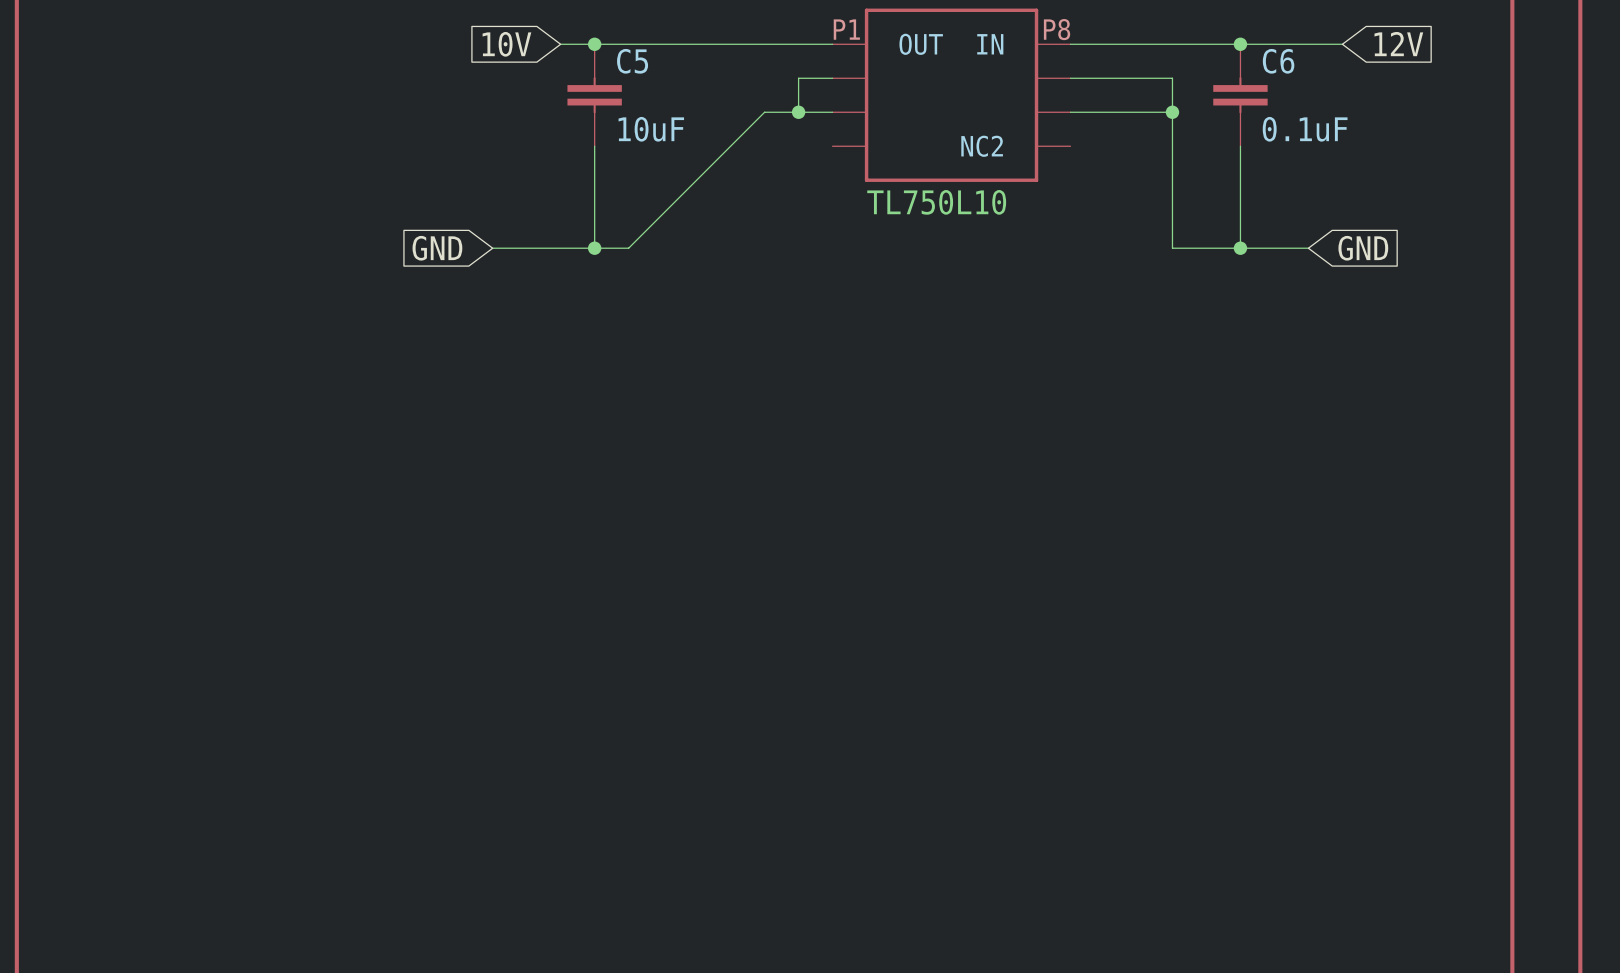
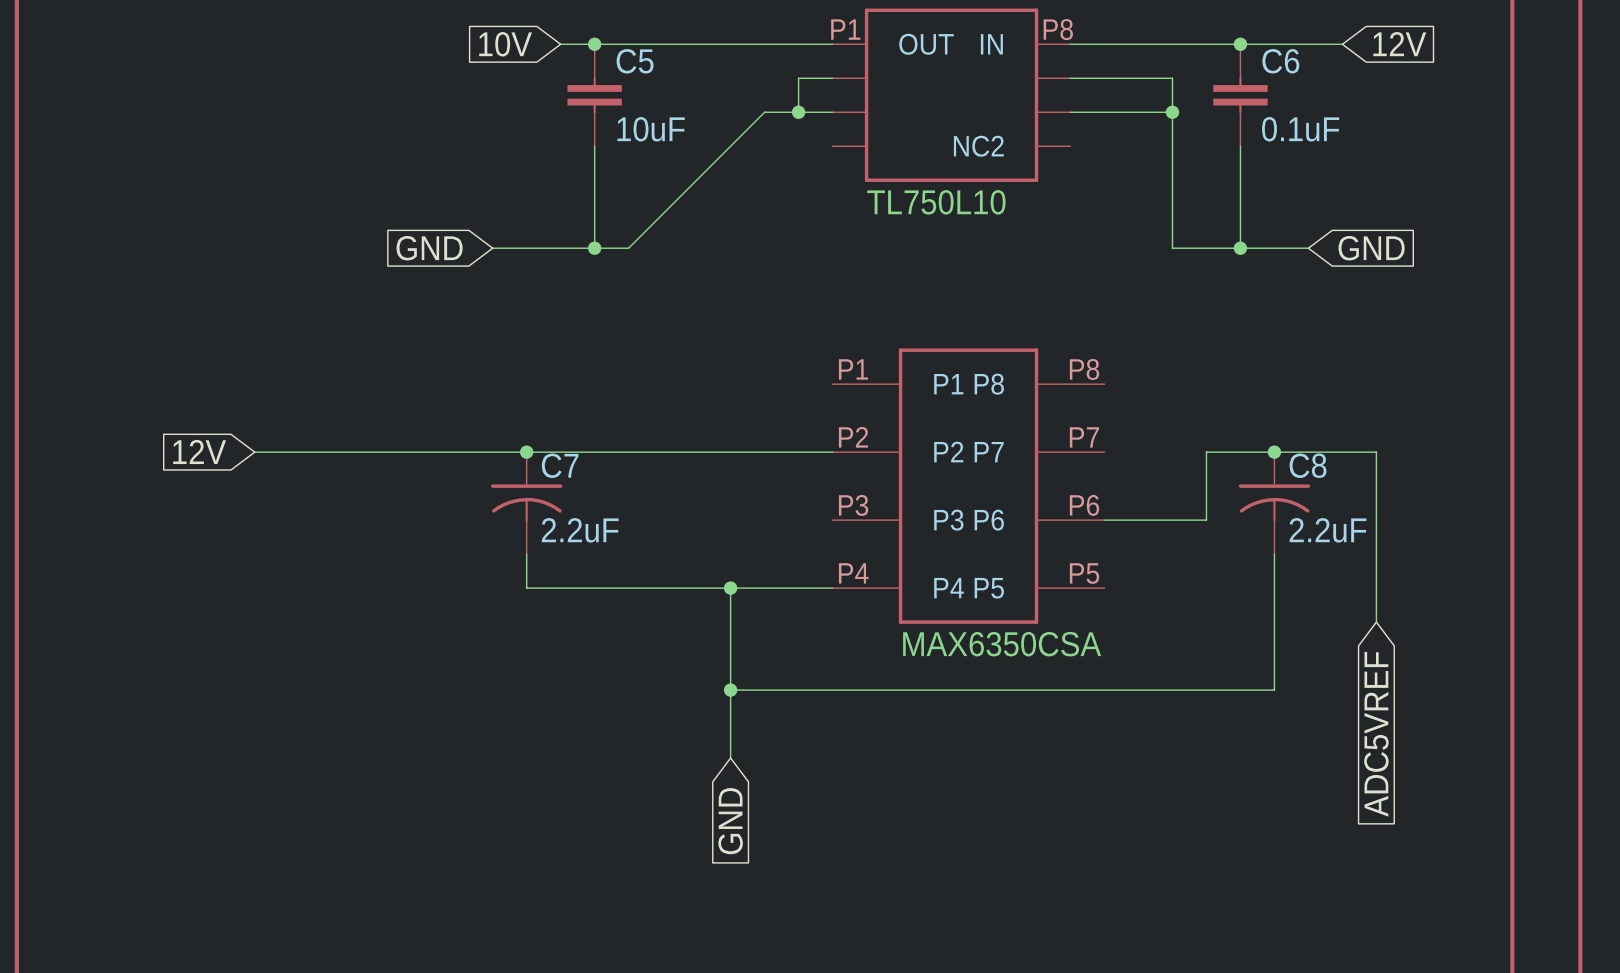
global label: none -> 12V (199, 451)
wire: none -> (254, 452) (832, 452)
junction: none -> (526, 452)
junction: none -> (1274, 452)
part: none -> (968, 486)
C7: none -> 2.2uF (526, 503)
C8: none -> 2.2uF (1274, 503)
wire: none -> (1104, 520) (1206, 520) (1206, 452) (1376, 452) (1376, 622)
wire: none -> (526, 554) (526, 588) (832, 588)
wire: none -> (1274, 554) (1274, 690) (730, 690)
wire: none -> (730, 588) (730, 758)
junction: none -> (730, 588)
text: none -> MAX6350CSA (1002, 644)
junction: none -> (730, 690)
global label: none -> ADC5VREF (1376, 734)
global label: none -> GND (730, 821)

